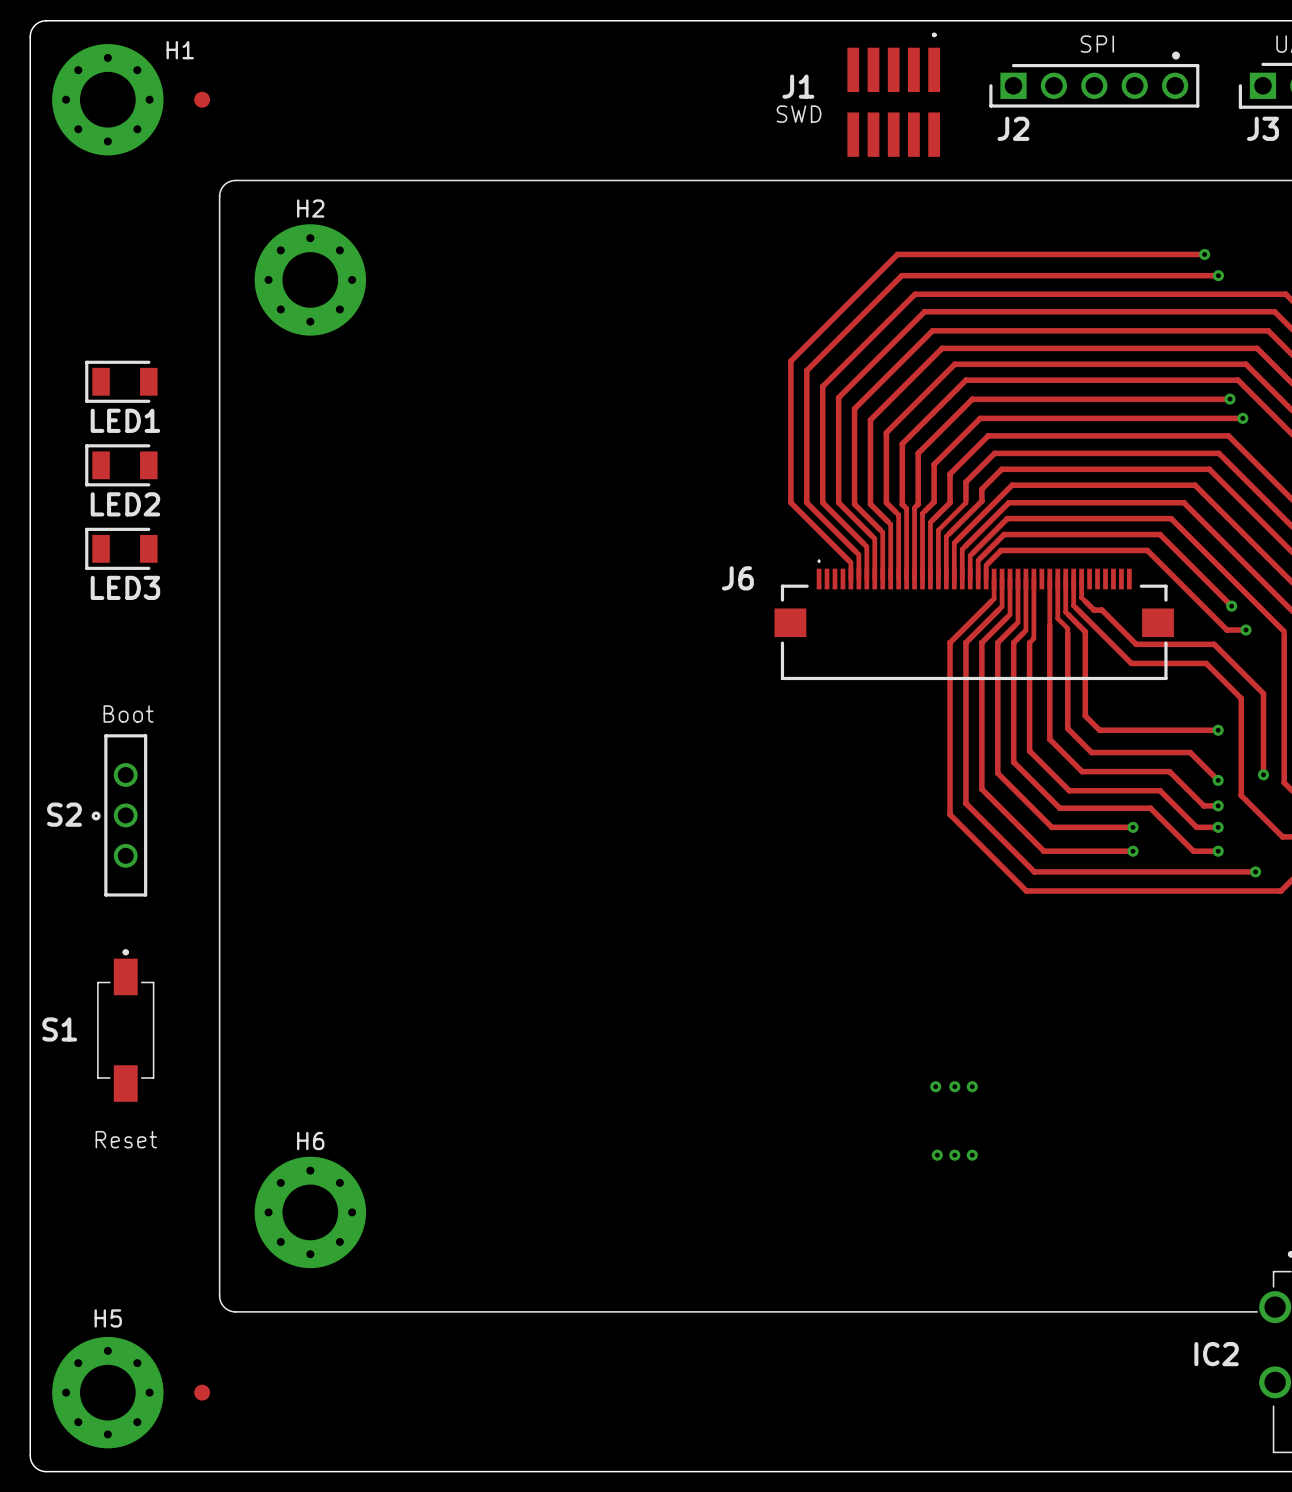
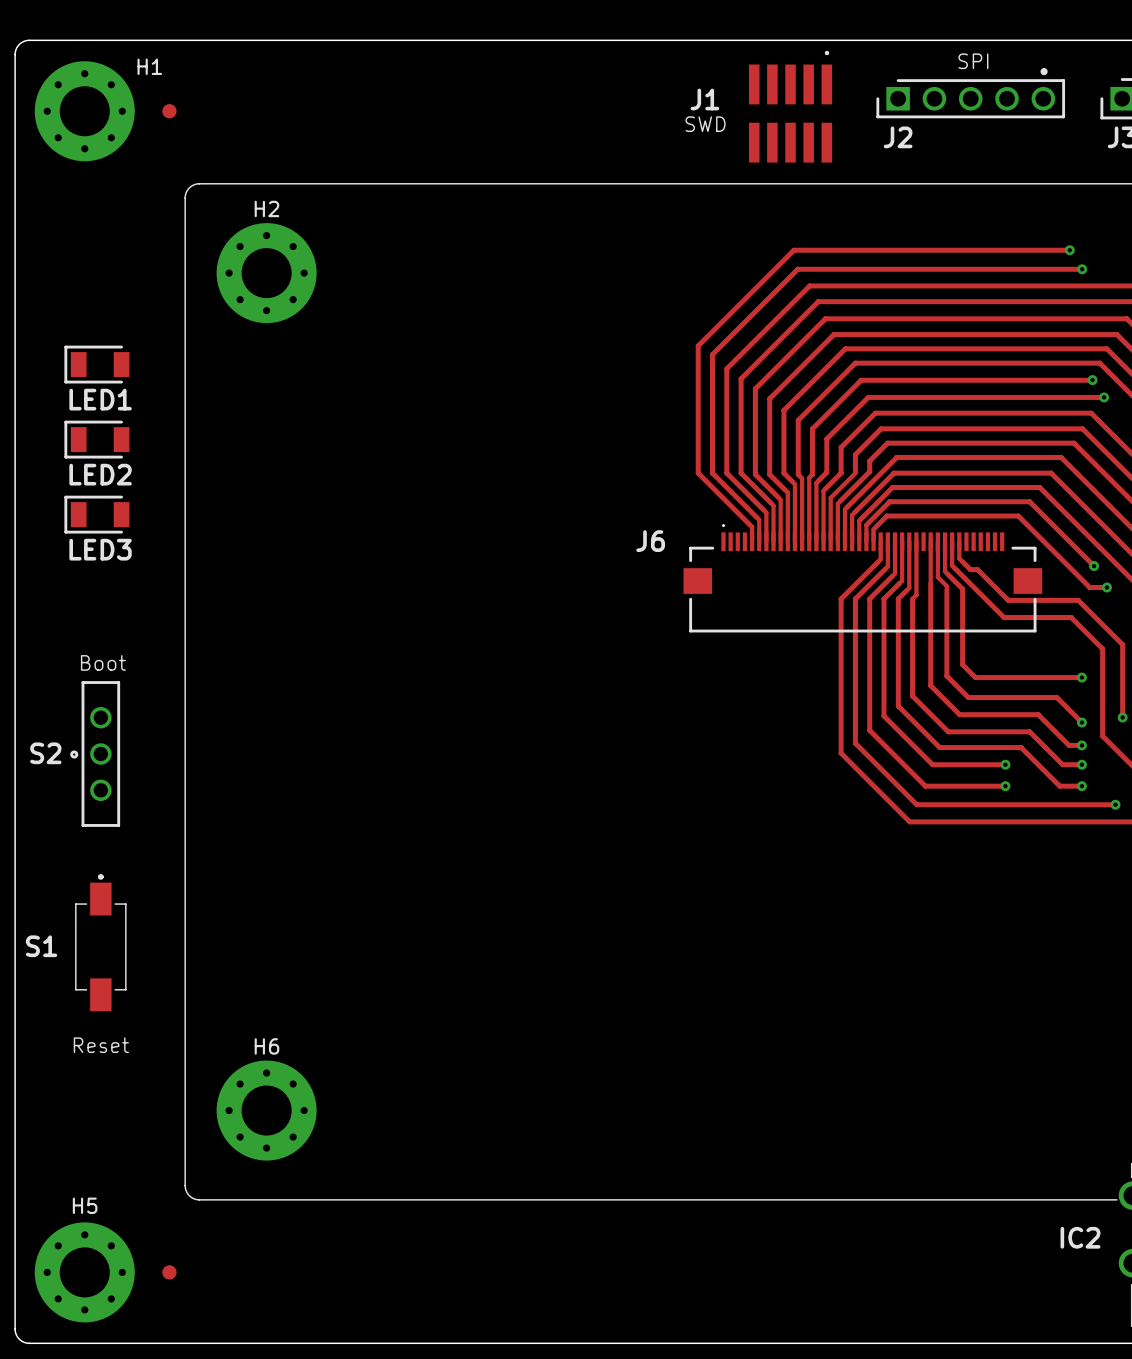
via: (935, 1086) -> none
via: (954, 1086) -> none
via: (972, 1086) -> none
via: (937, 1155) -> none
via: (954, 1155) -> none
via: (972, 1155) -> none

